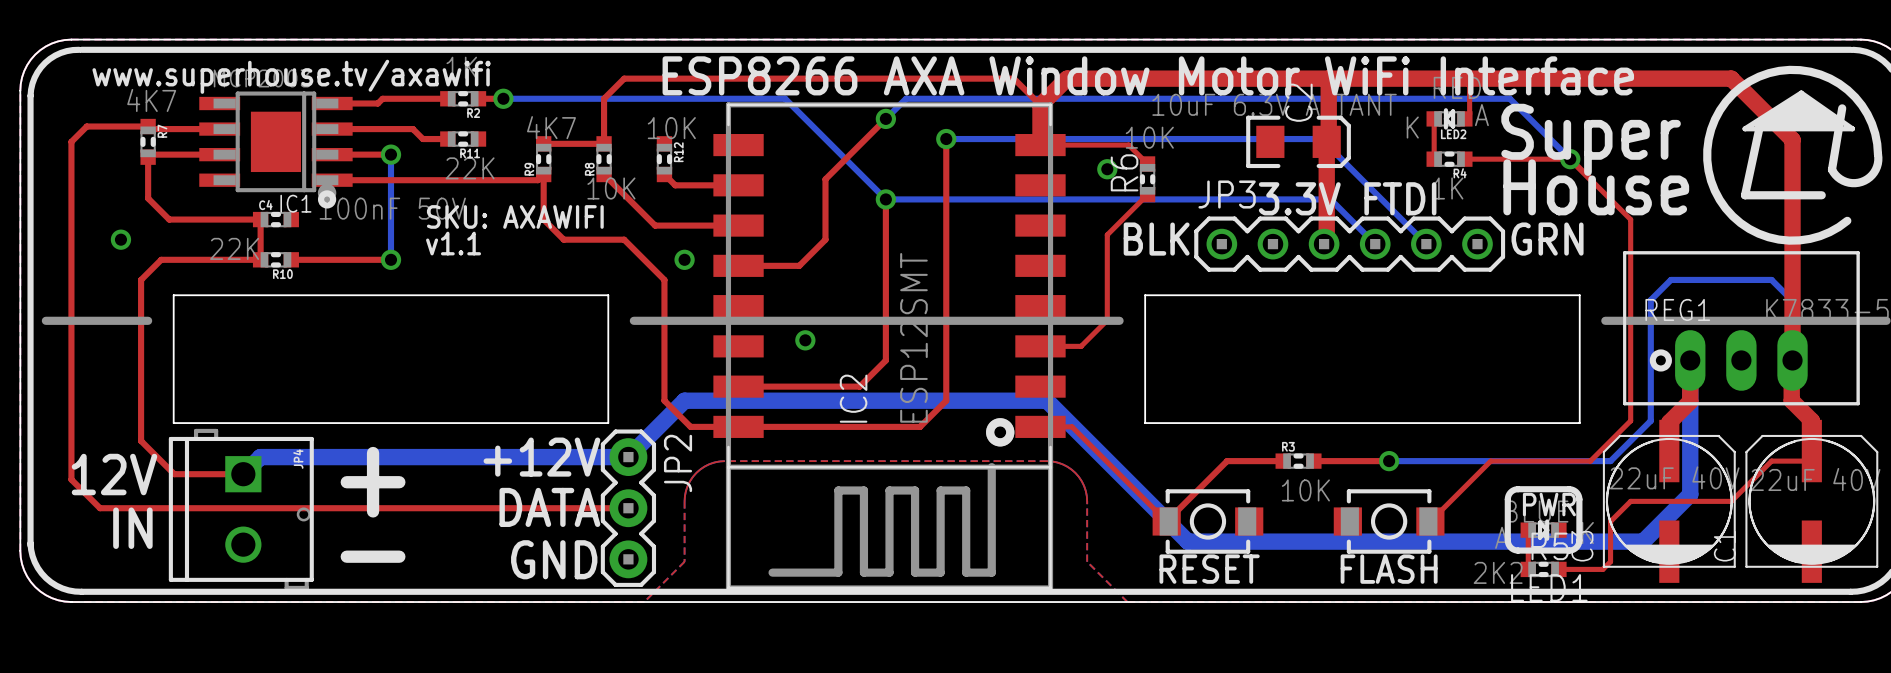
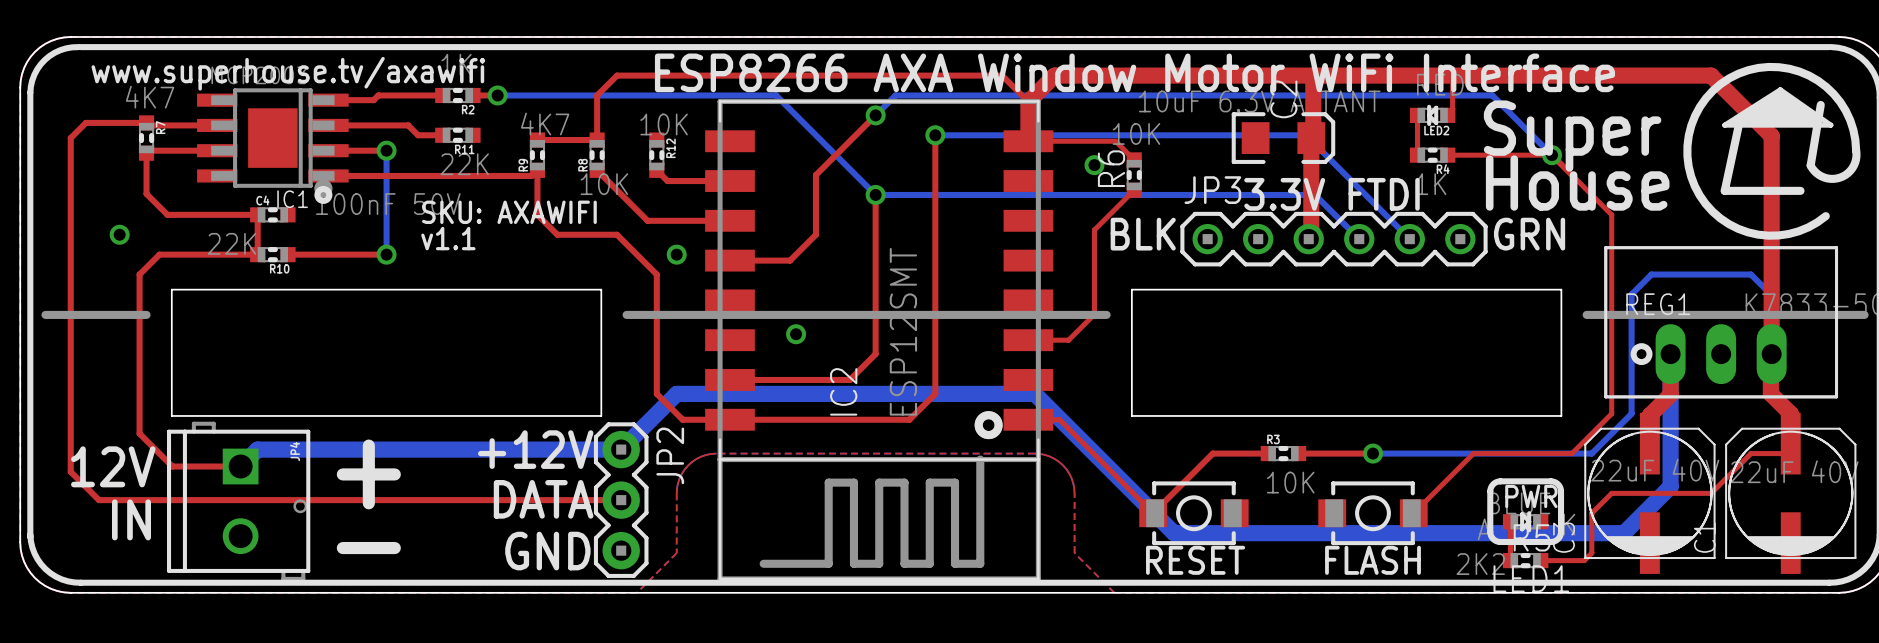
text: A (1481, 115) -> none
text: K (1412, 127) -> none

